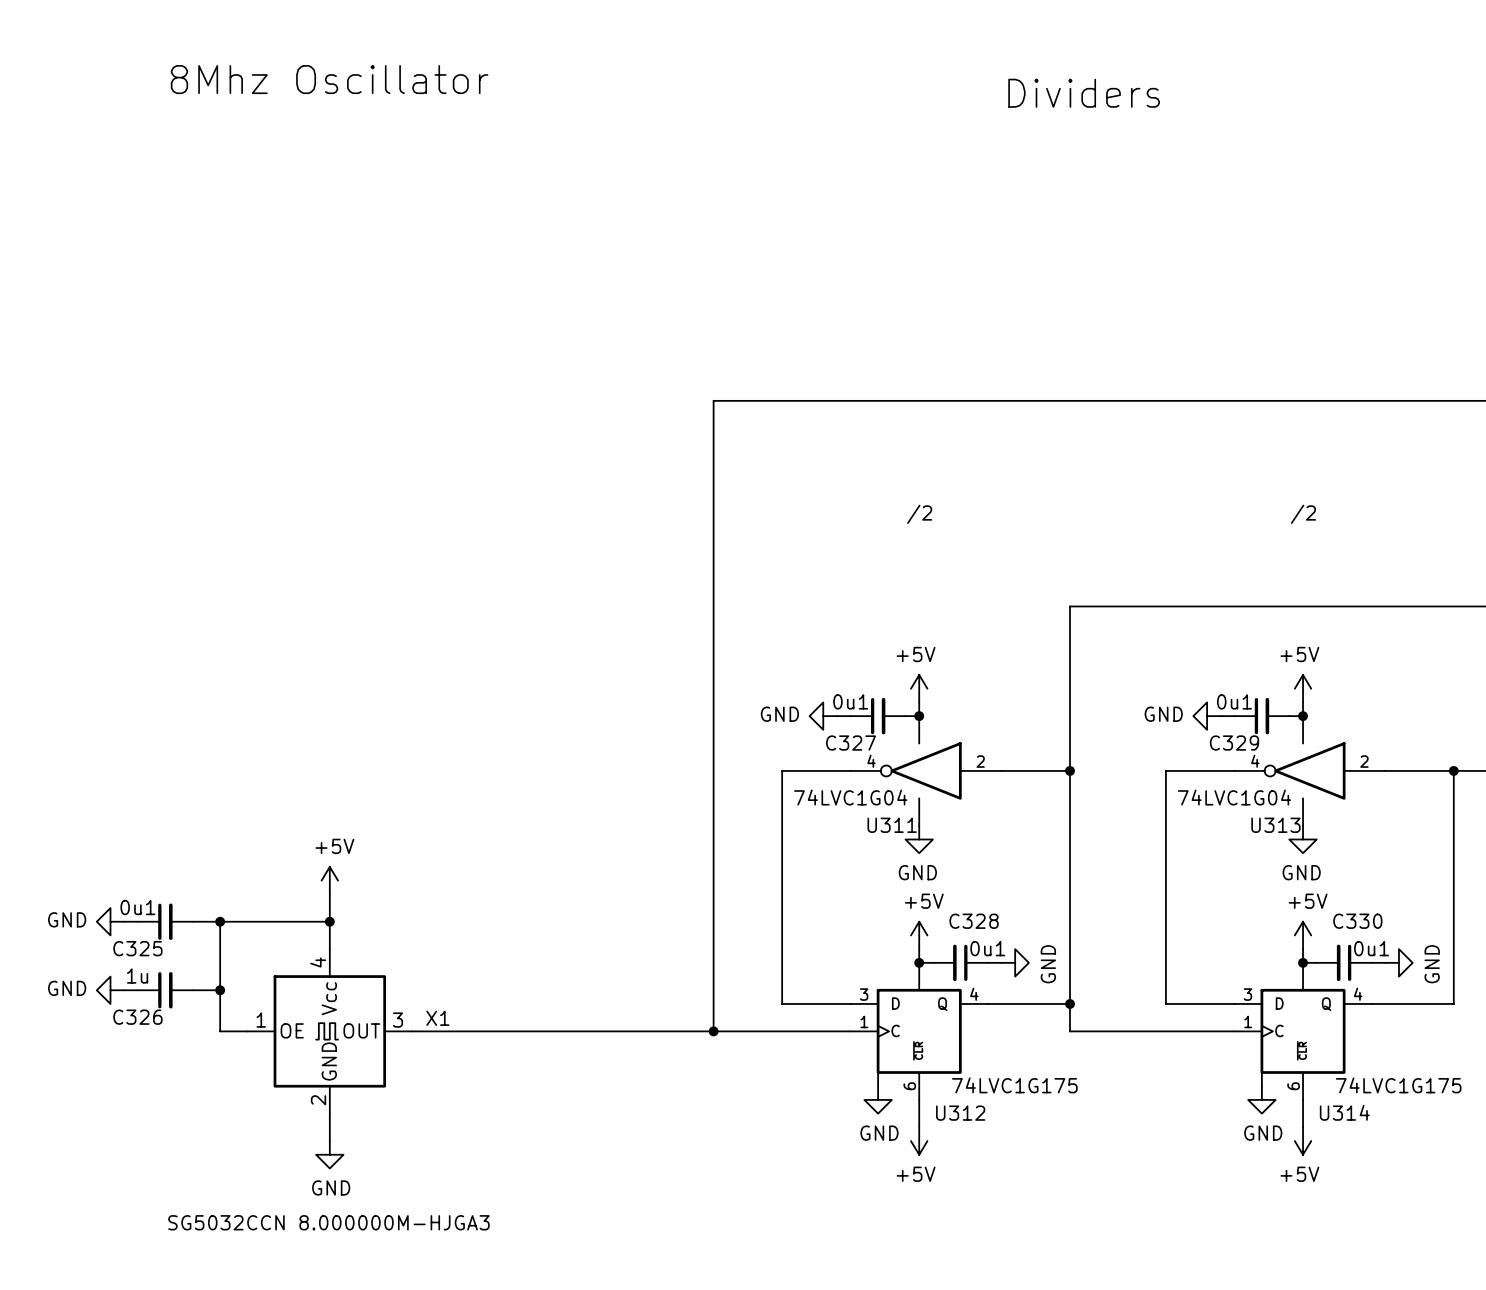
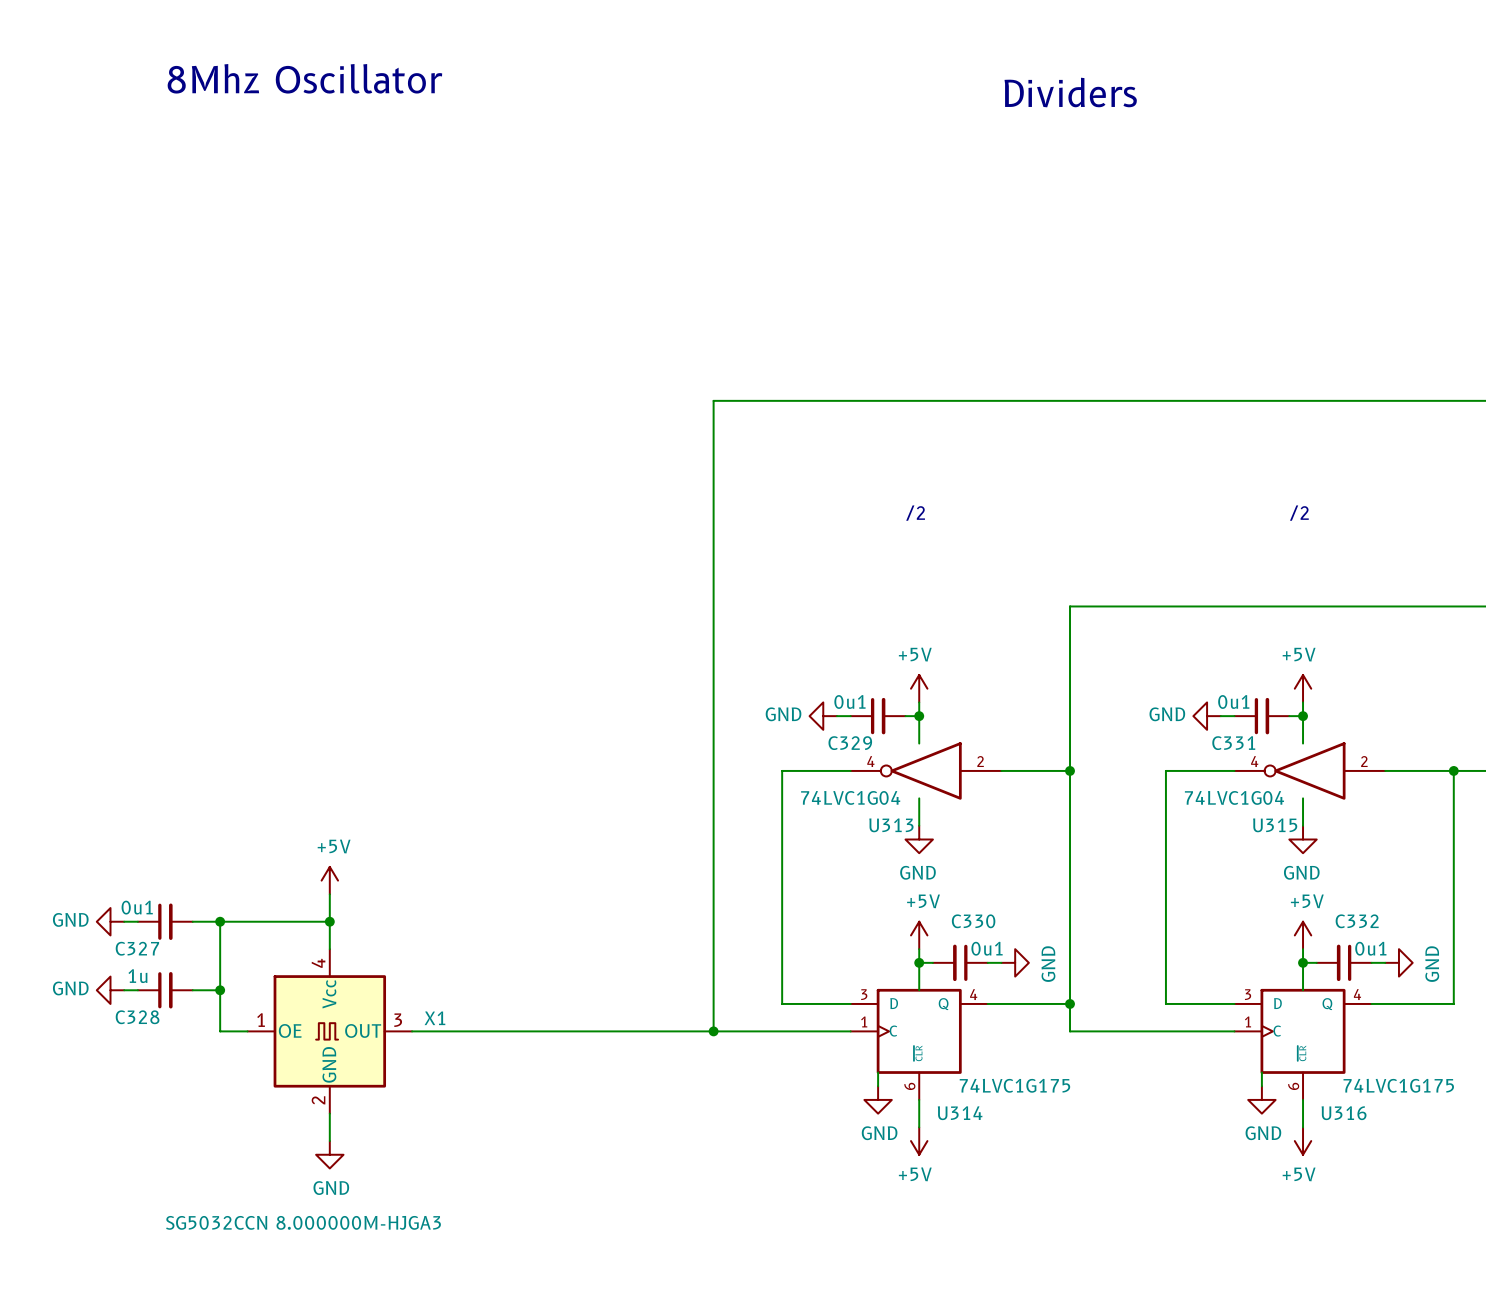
C327 name: C327 (851, 743) -> C329 (850, 743)
C329 name: C329 (1234, 743) -> C331 (1233, 743)
U311 name: U311 (892, 825) -> U313 (891, 825)
U313 name: U313 (1275, 825) -> U315 (1275, 825)
C328 name: C328 (974, 921) -> C330 (973, 921)
C330 name: C330 (1357, 921) -> C332 (1357, 921)
C325 name: C325 (137, 948) -> C327 (137, 948)
C326 name: C326 (137, 1017) -> C328 (137, 1017)
U314 name: U314 (1344, 1112) -> U316 (1344, 1113)
U312 name: U312 (960, 1113) -> U314 (960, 1113)

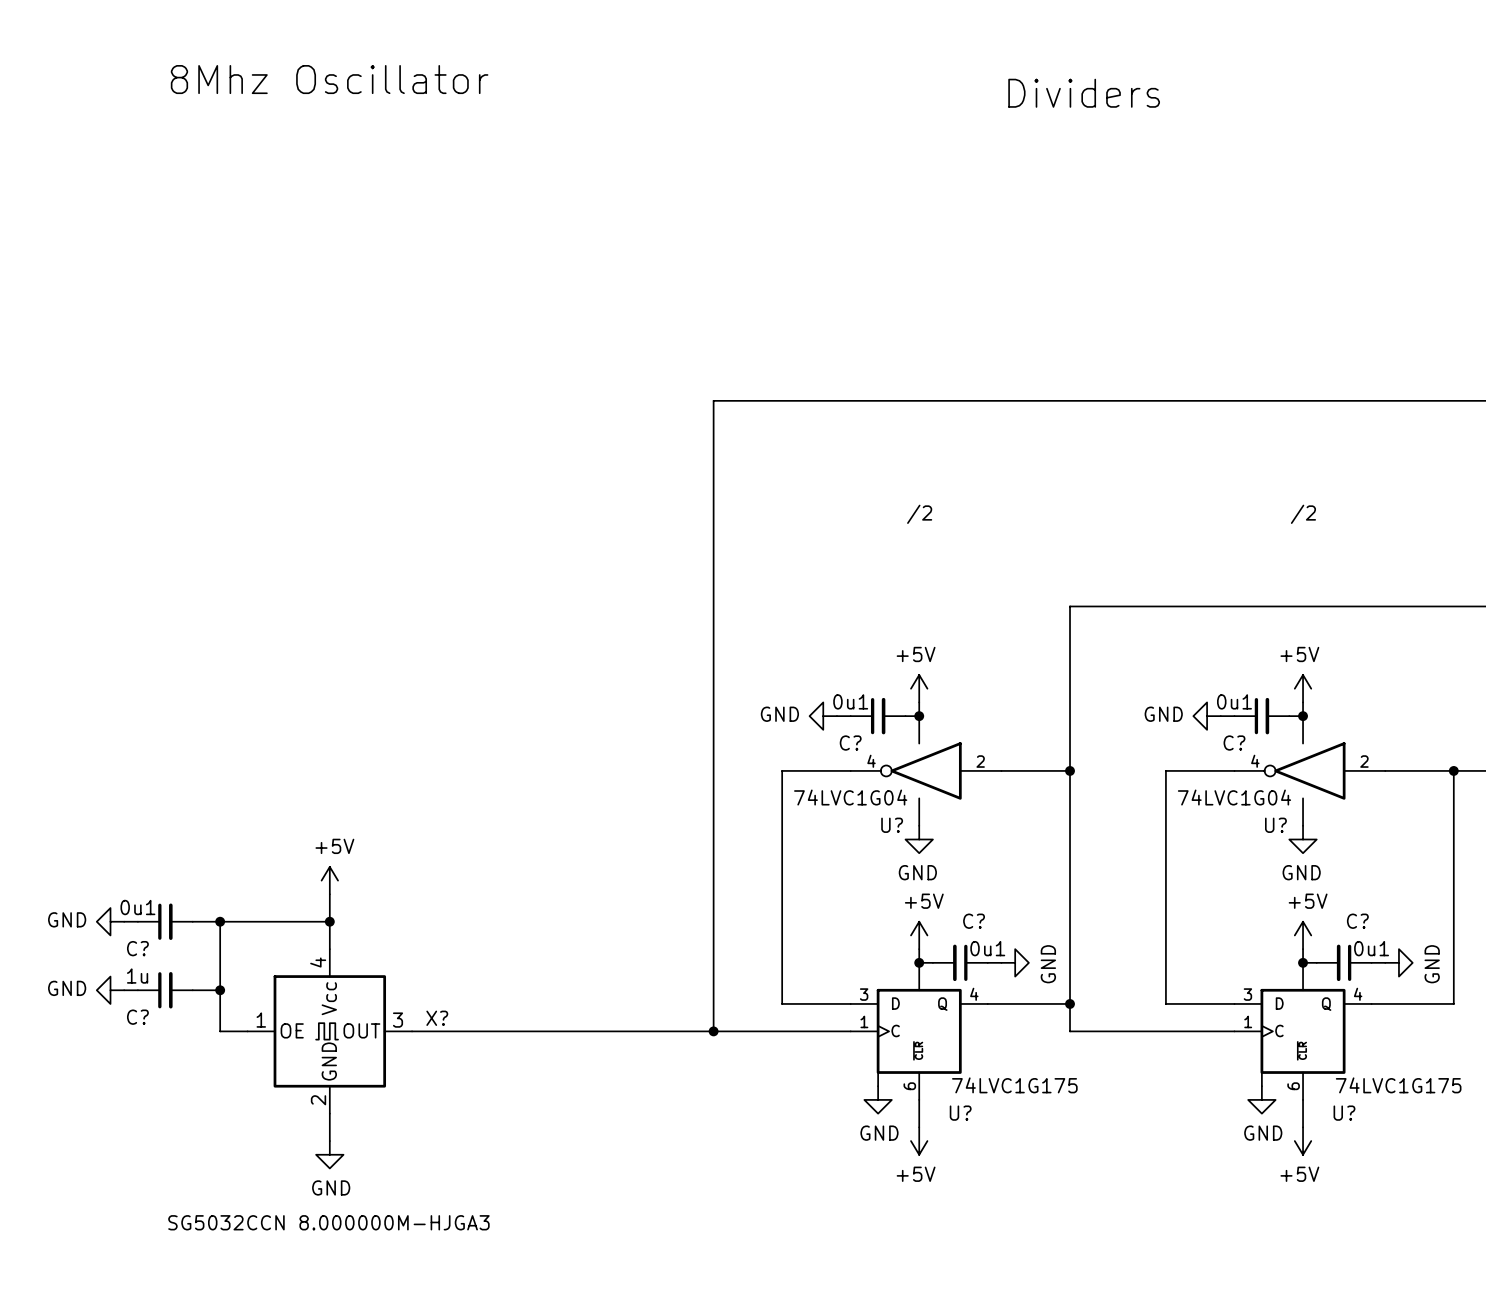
C329 name: C329 (850, 743) -> C? (850, 743)
C331 name: C331 (1233, 743) -> C? (1234, 743)
U313 name: U313 (891, 825) -> U? (892, 825)
U315 name: U315 (1275, 825) -> U? (1275, 825)
C330 name: C330 (973, 921) -> C? (974, 921)
C332 name: C332 (1357, 921) -> C? (1357, 921)
C327 name: C327 (137, 948) -> C? (137, 948)
C328 name: C328 (137, 1017) -> C? (137, 1017)
X1 name: X1 (434, 1018) -> X? (437, 1018)
U314 name: U314 (960, 1113) -> U? (960, 1113)
U316 name: U316 (1344, 1113) -> U? (1344, 1113)

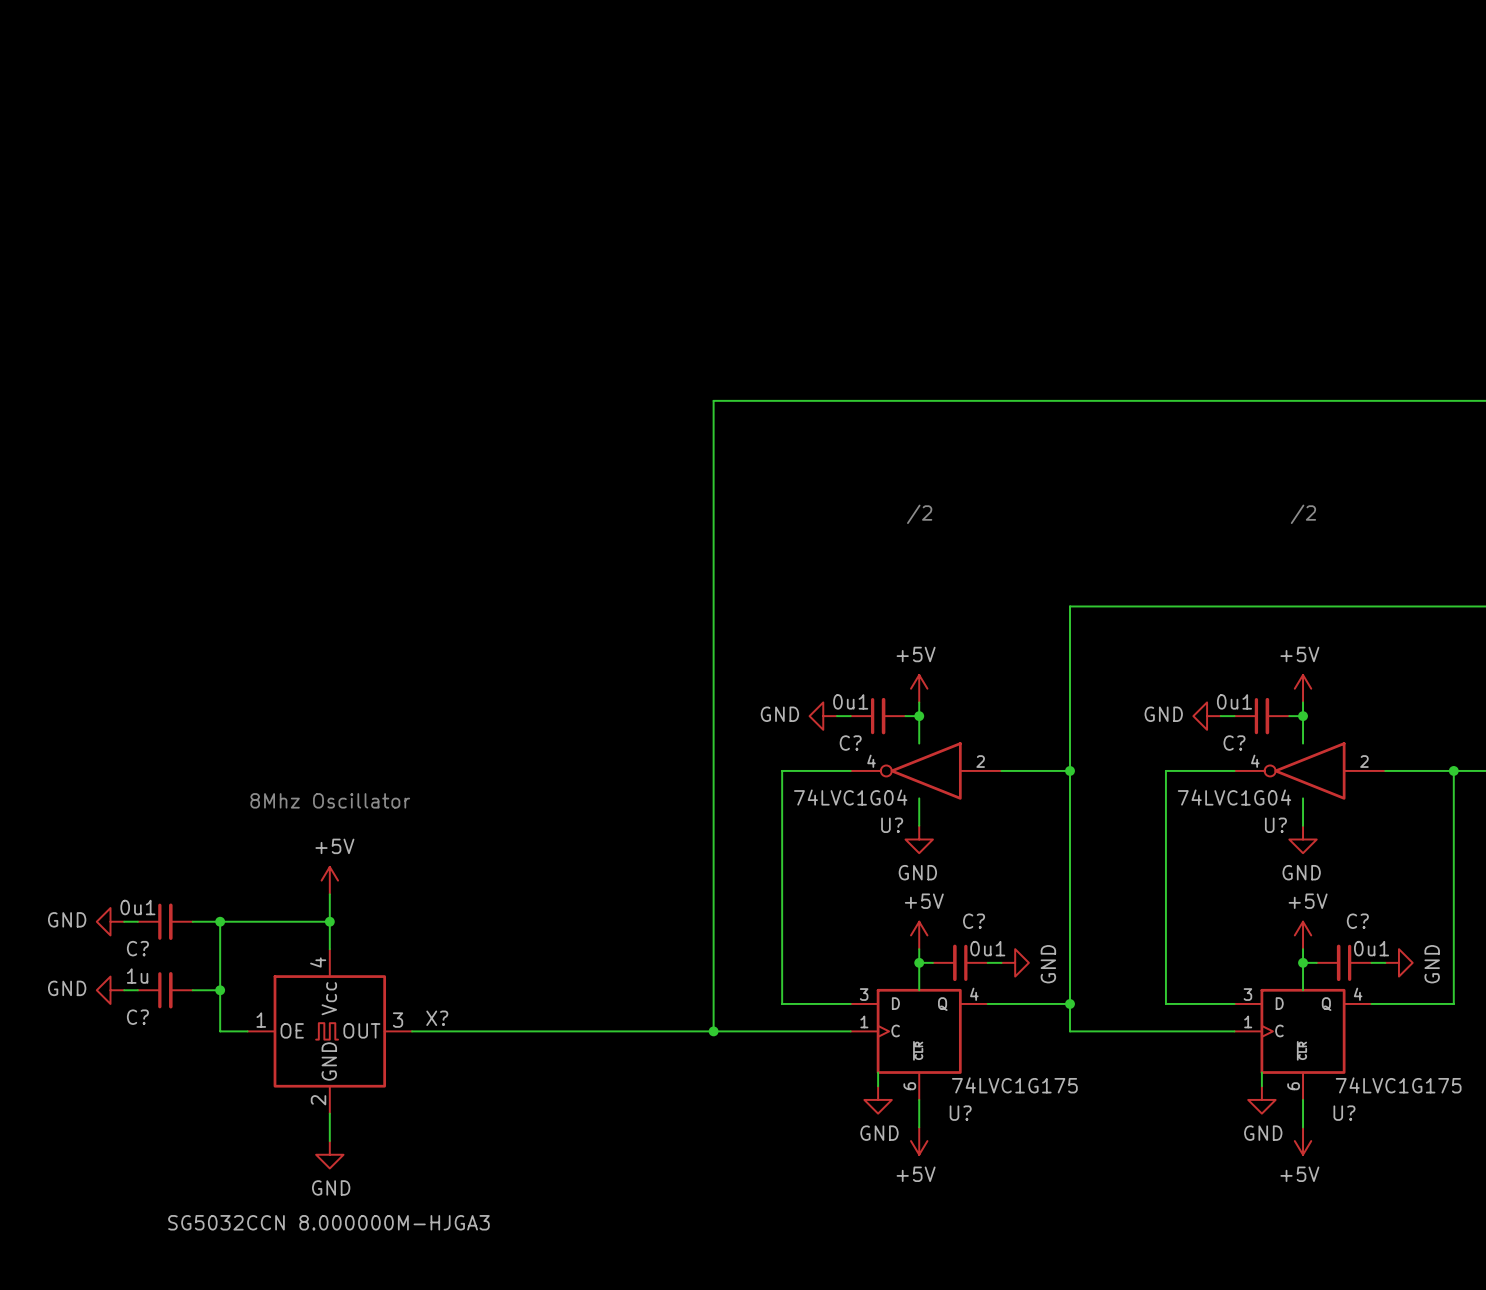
text: 8Mhz Oscillator (329, 79) -> none
text: Dividers (1084, 93) -> none
text: none -> 8Mhz Oscillator (330, 800)

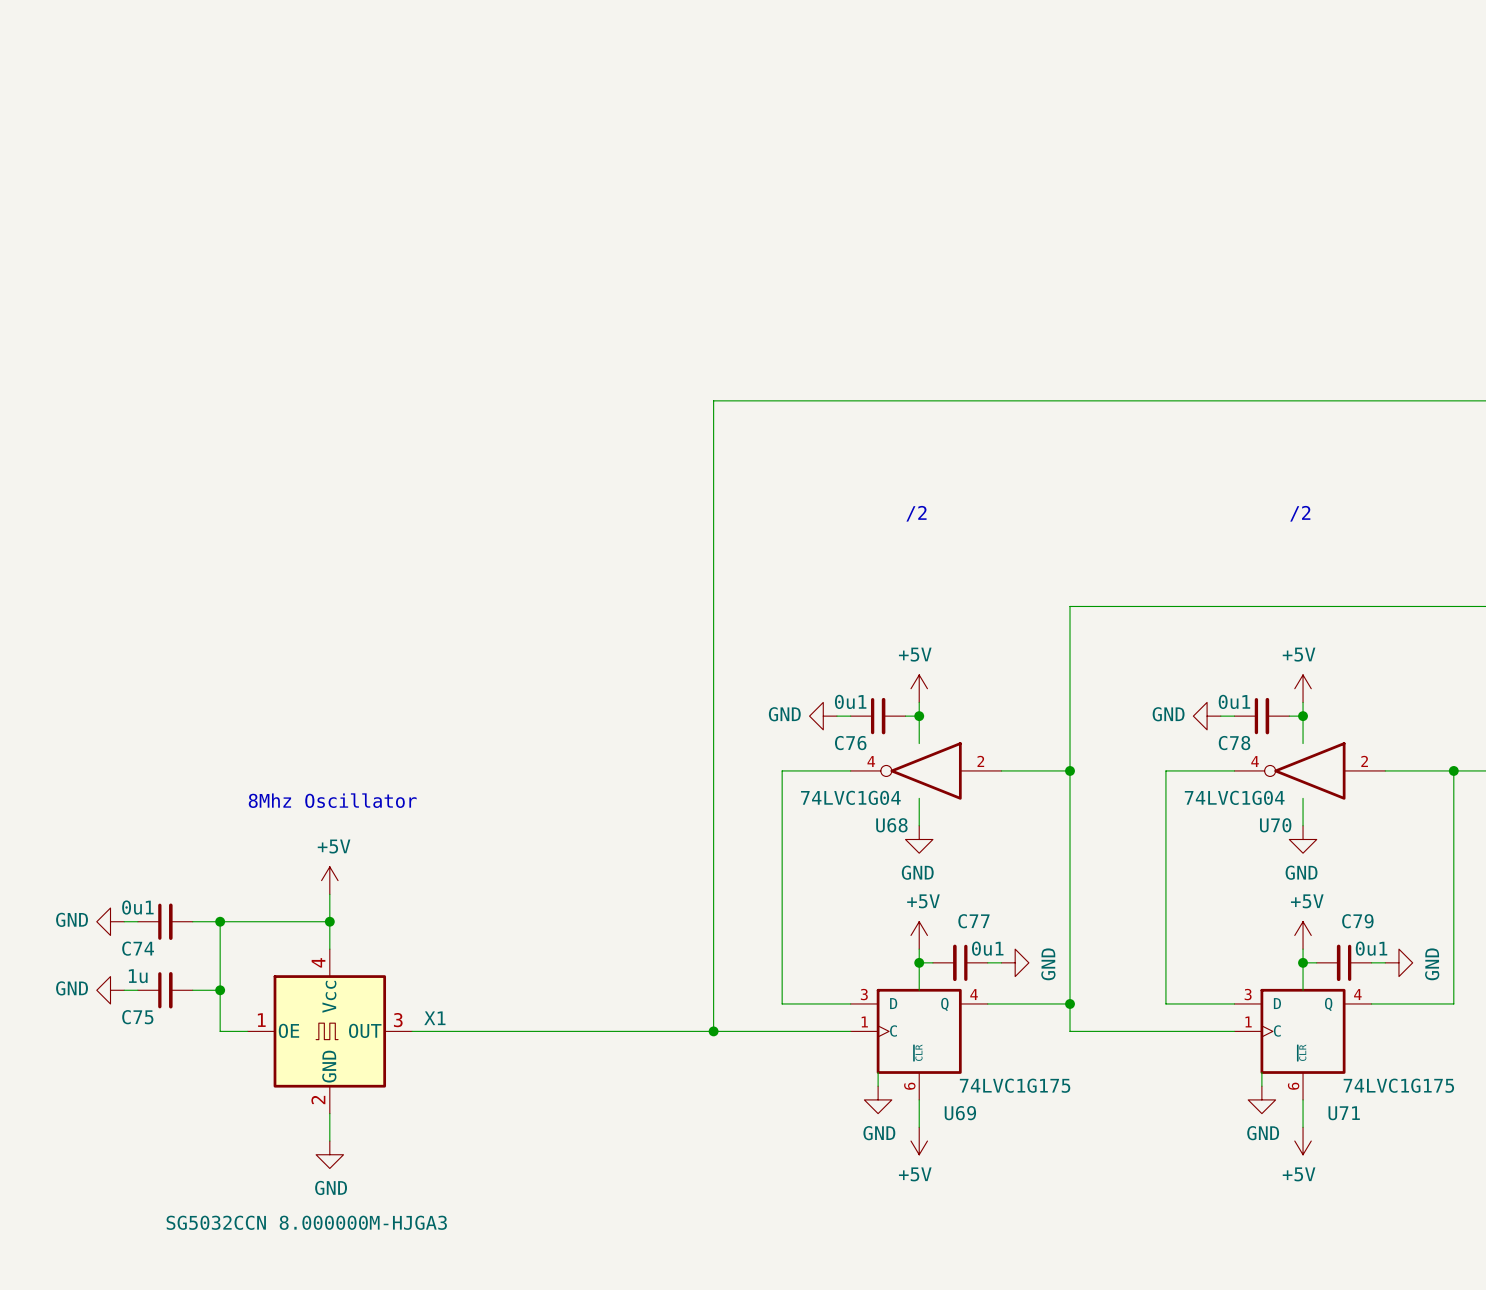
C? name: C? (850, 743) -> C76 (850, 743)
C? name: C? (1234, 743) -> C78 (1234, 743)
U? name: U? (892, 825) -> U68 (891, 825)
U? name: U? (1275, 825) -> U70 (1275, 825)
C? name: C? (974, 921) -> C77 (973, 921)
C? name: C? (1357, 921) -> C79 (1357, 921)
C? name: C? (137, 948) -> C74 (138, 948)
C? name: C? (137, 1017) -> C75 (137, 1017)
X? name: X? (437, 1018) -> X1 (434, 1018)
U? name: U? (960, 1113) -> U69 (960, 1113)
U? name: U? (1344, 1113) -> U71 (1344, 1113)

